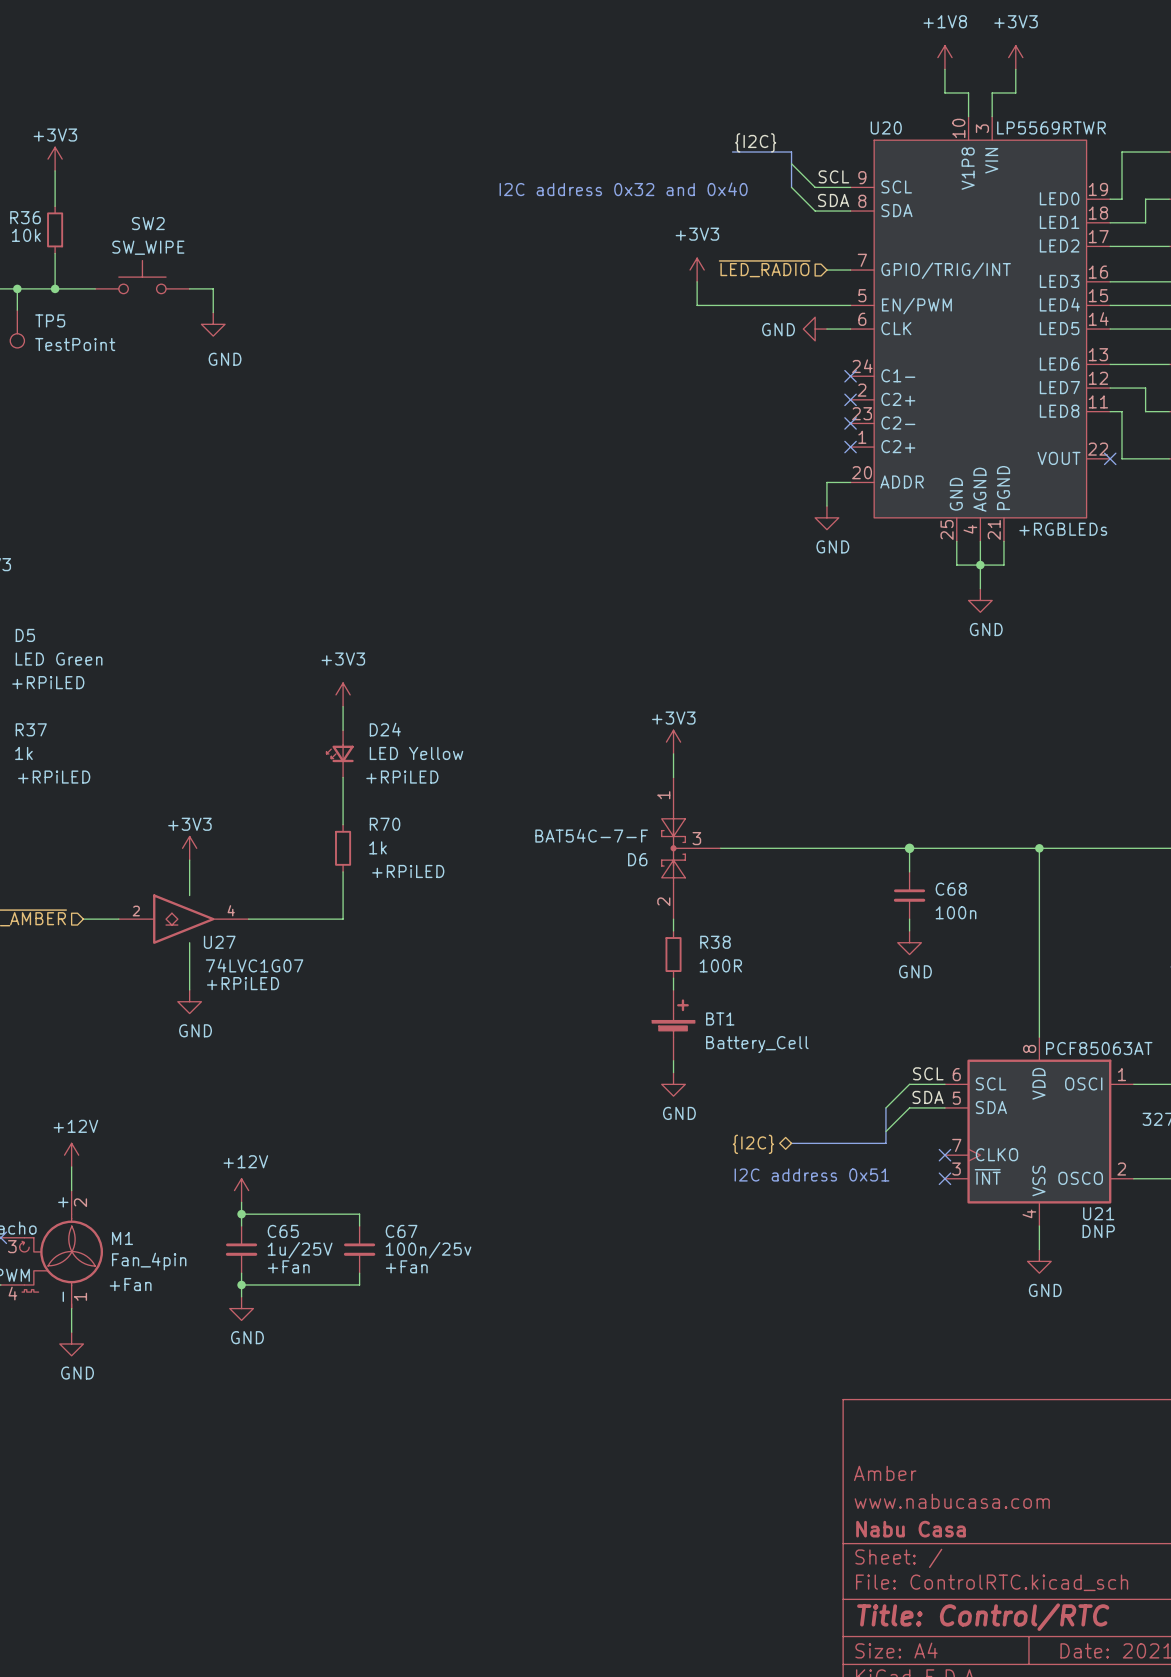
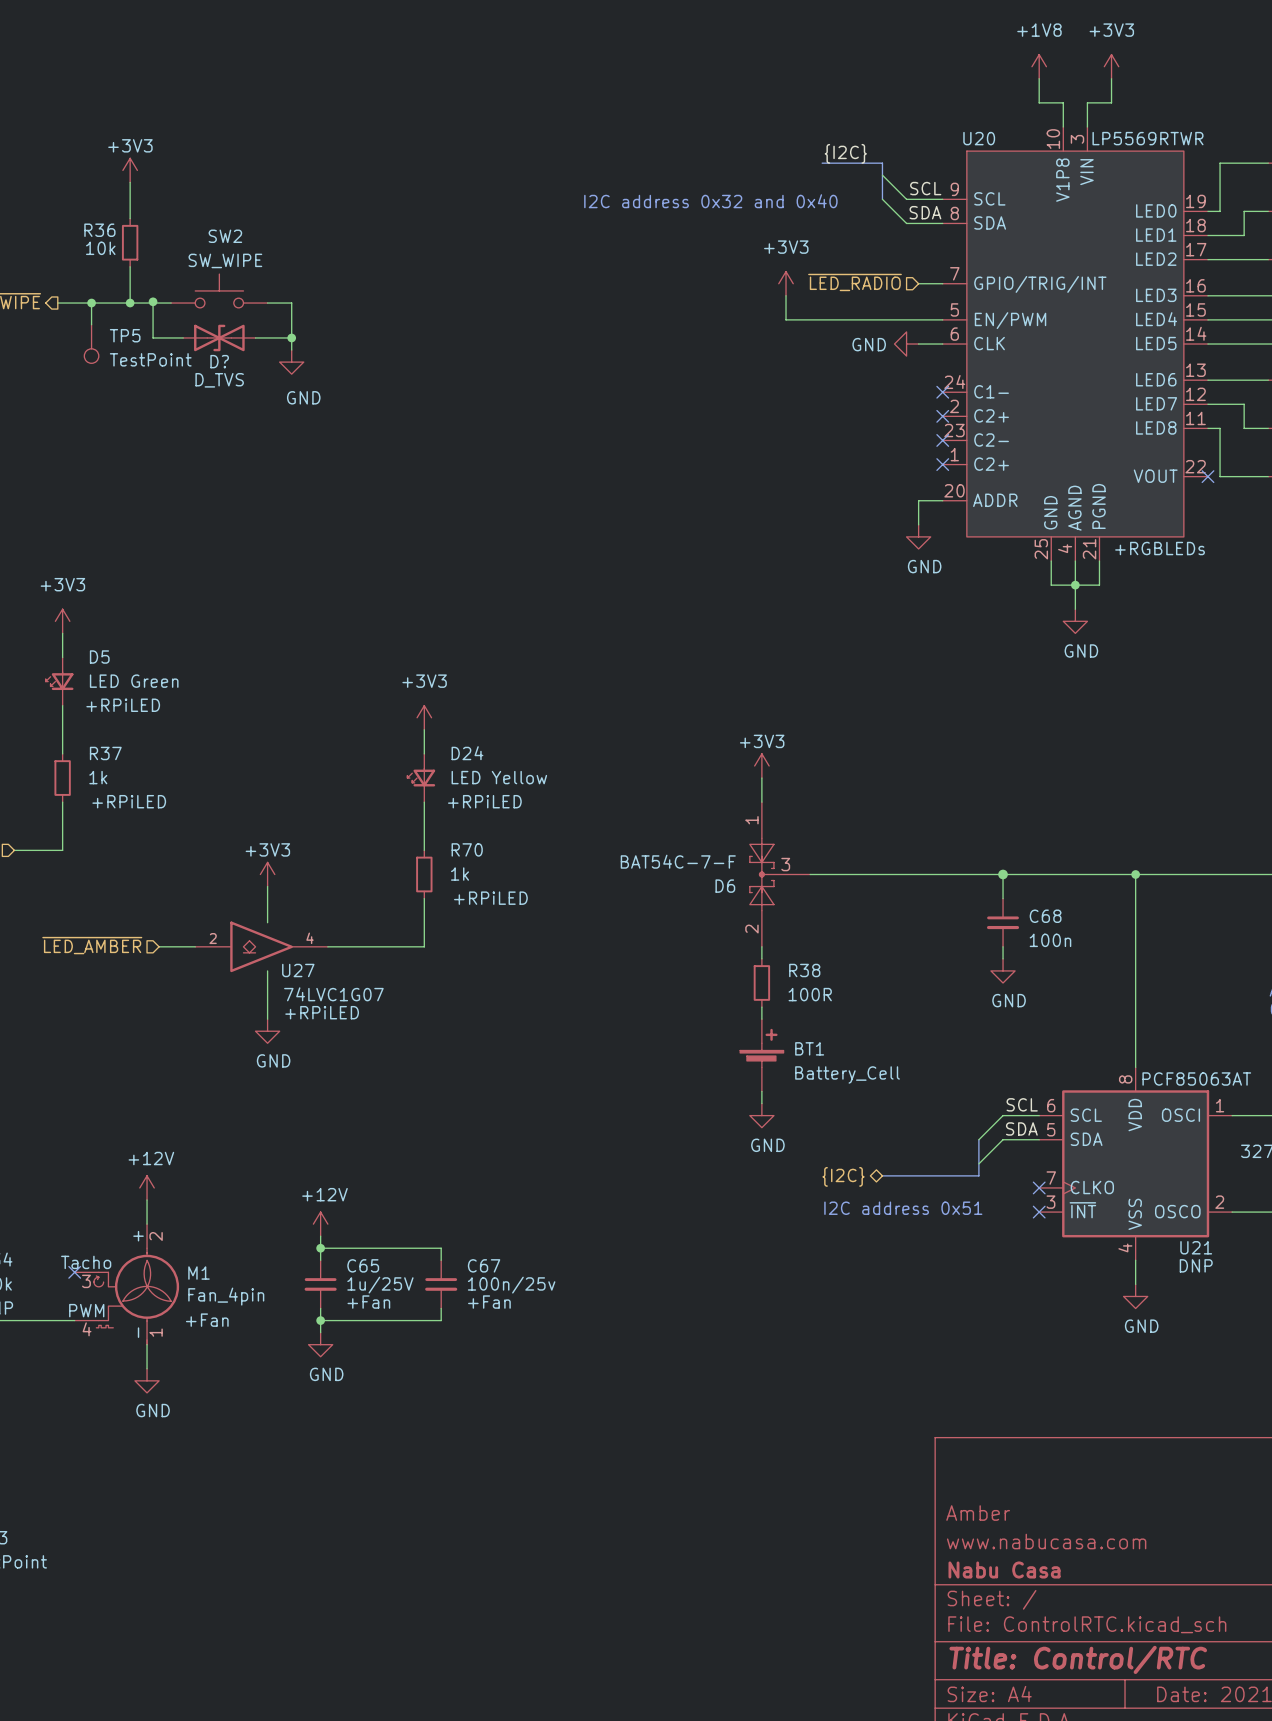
wire: none -> (153, 301) (153, 337) (183, 337)
junction: none -> (153, 301)
D?: none -> D_TVS (219, 337)
wire: none -> (255, 337) (291, 337)
junction: none -> (291, 337)
power symbol position: GND (213, 324) -> GND (291, 362)

